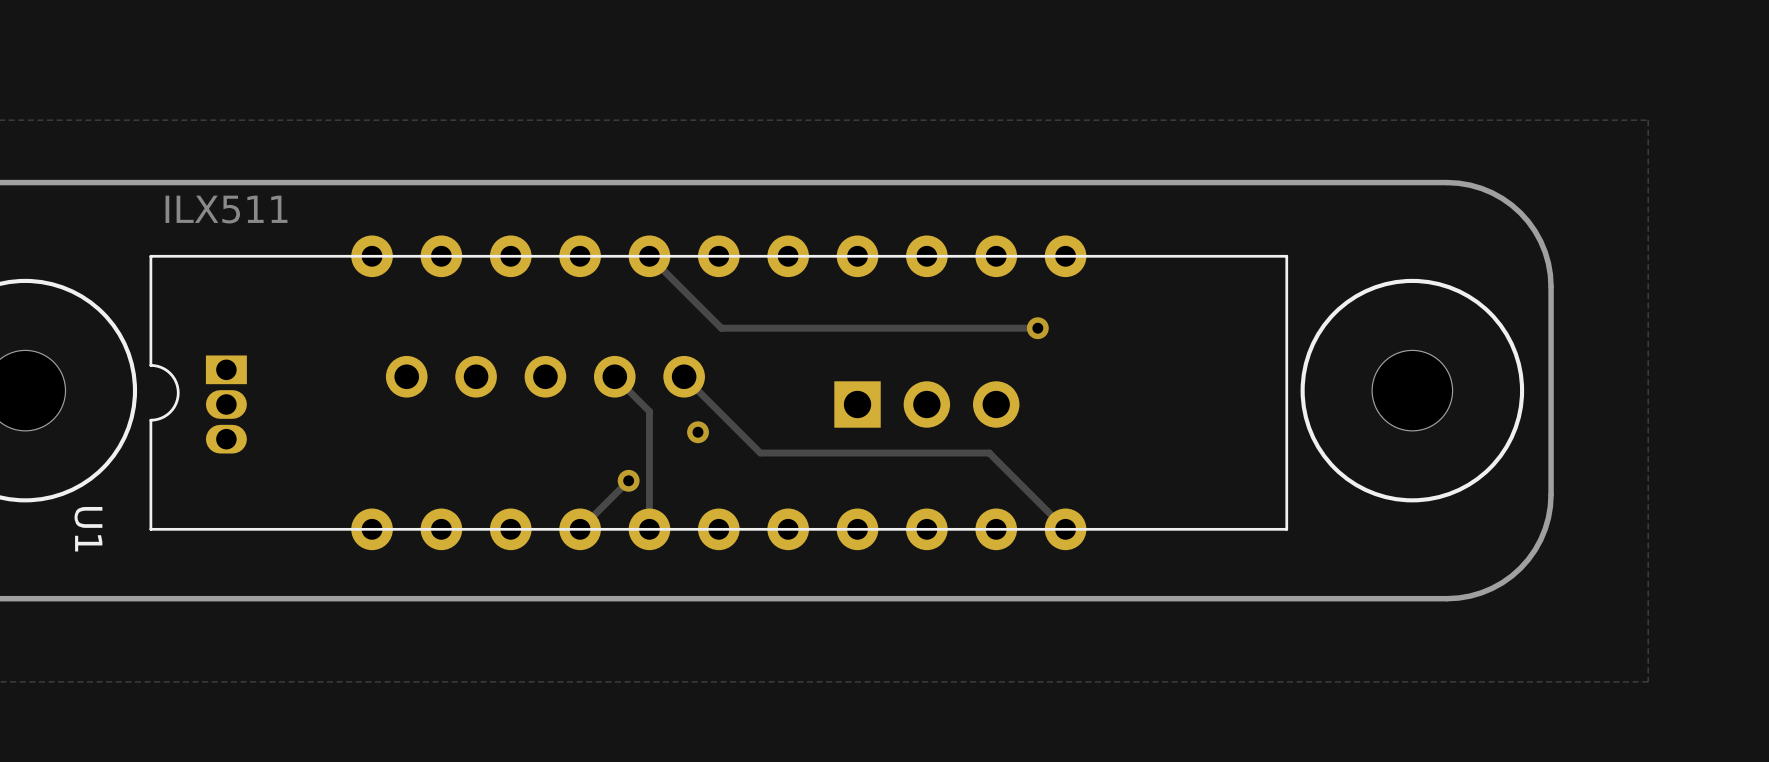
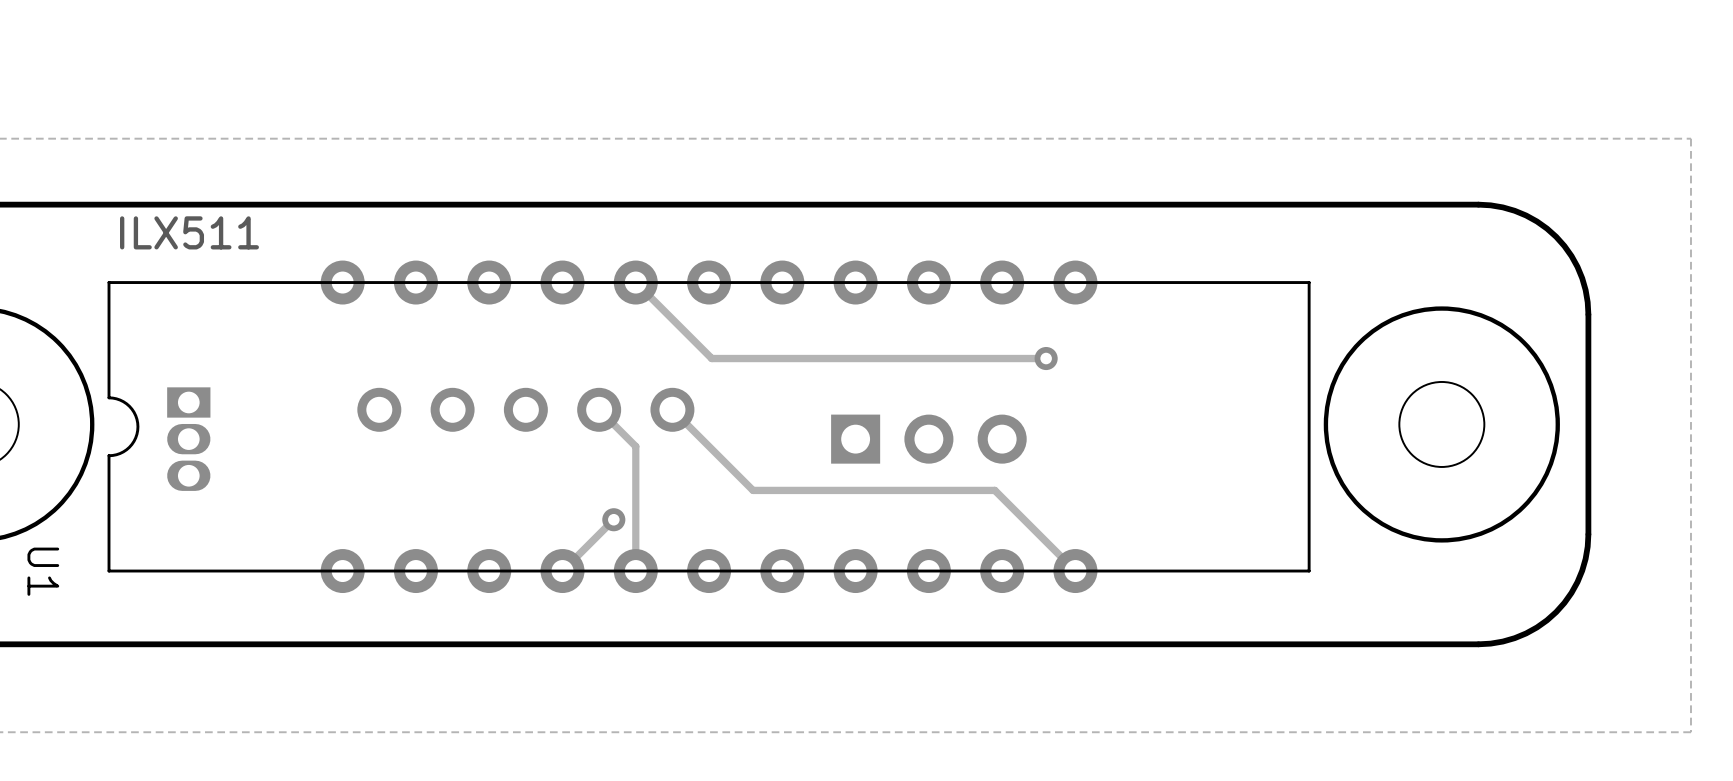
via: (698, 432) -> none

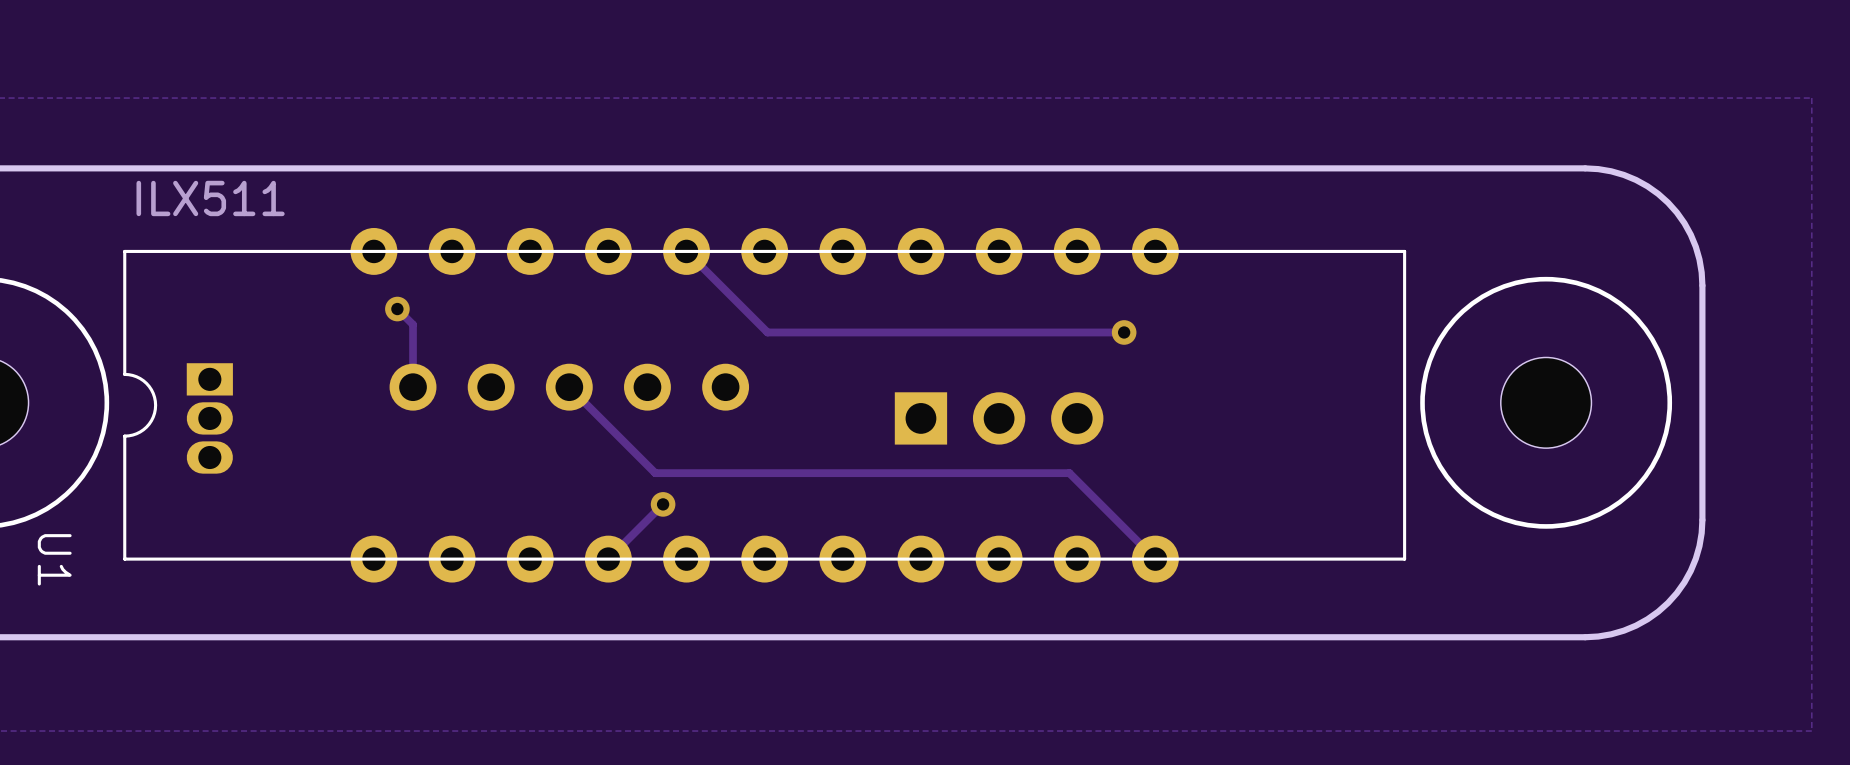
track: none -> (397, 309) (413, 324) (413, 387)
via: none -> (397, 309)
track: (599, 409) (635, 446) (635, 571) -> none
track: (672, 409) (753, 490) -> (569, 387) (655, 473) (811, 473)

